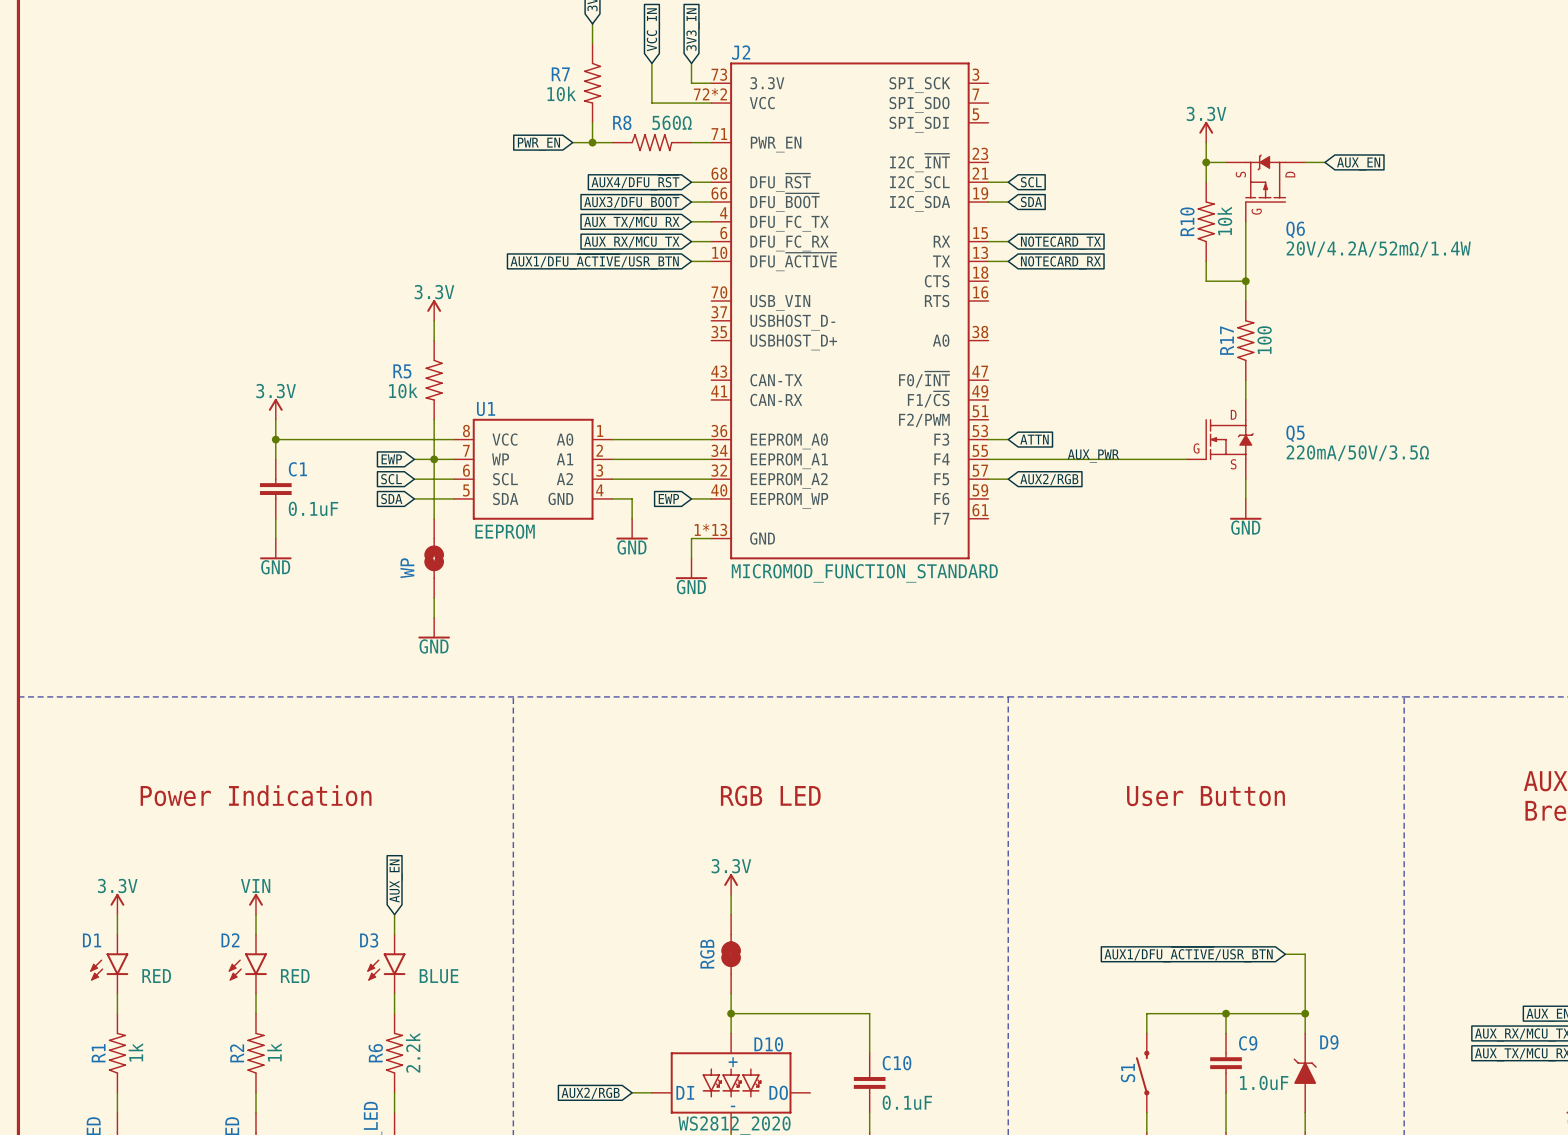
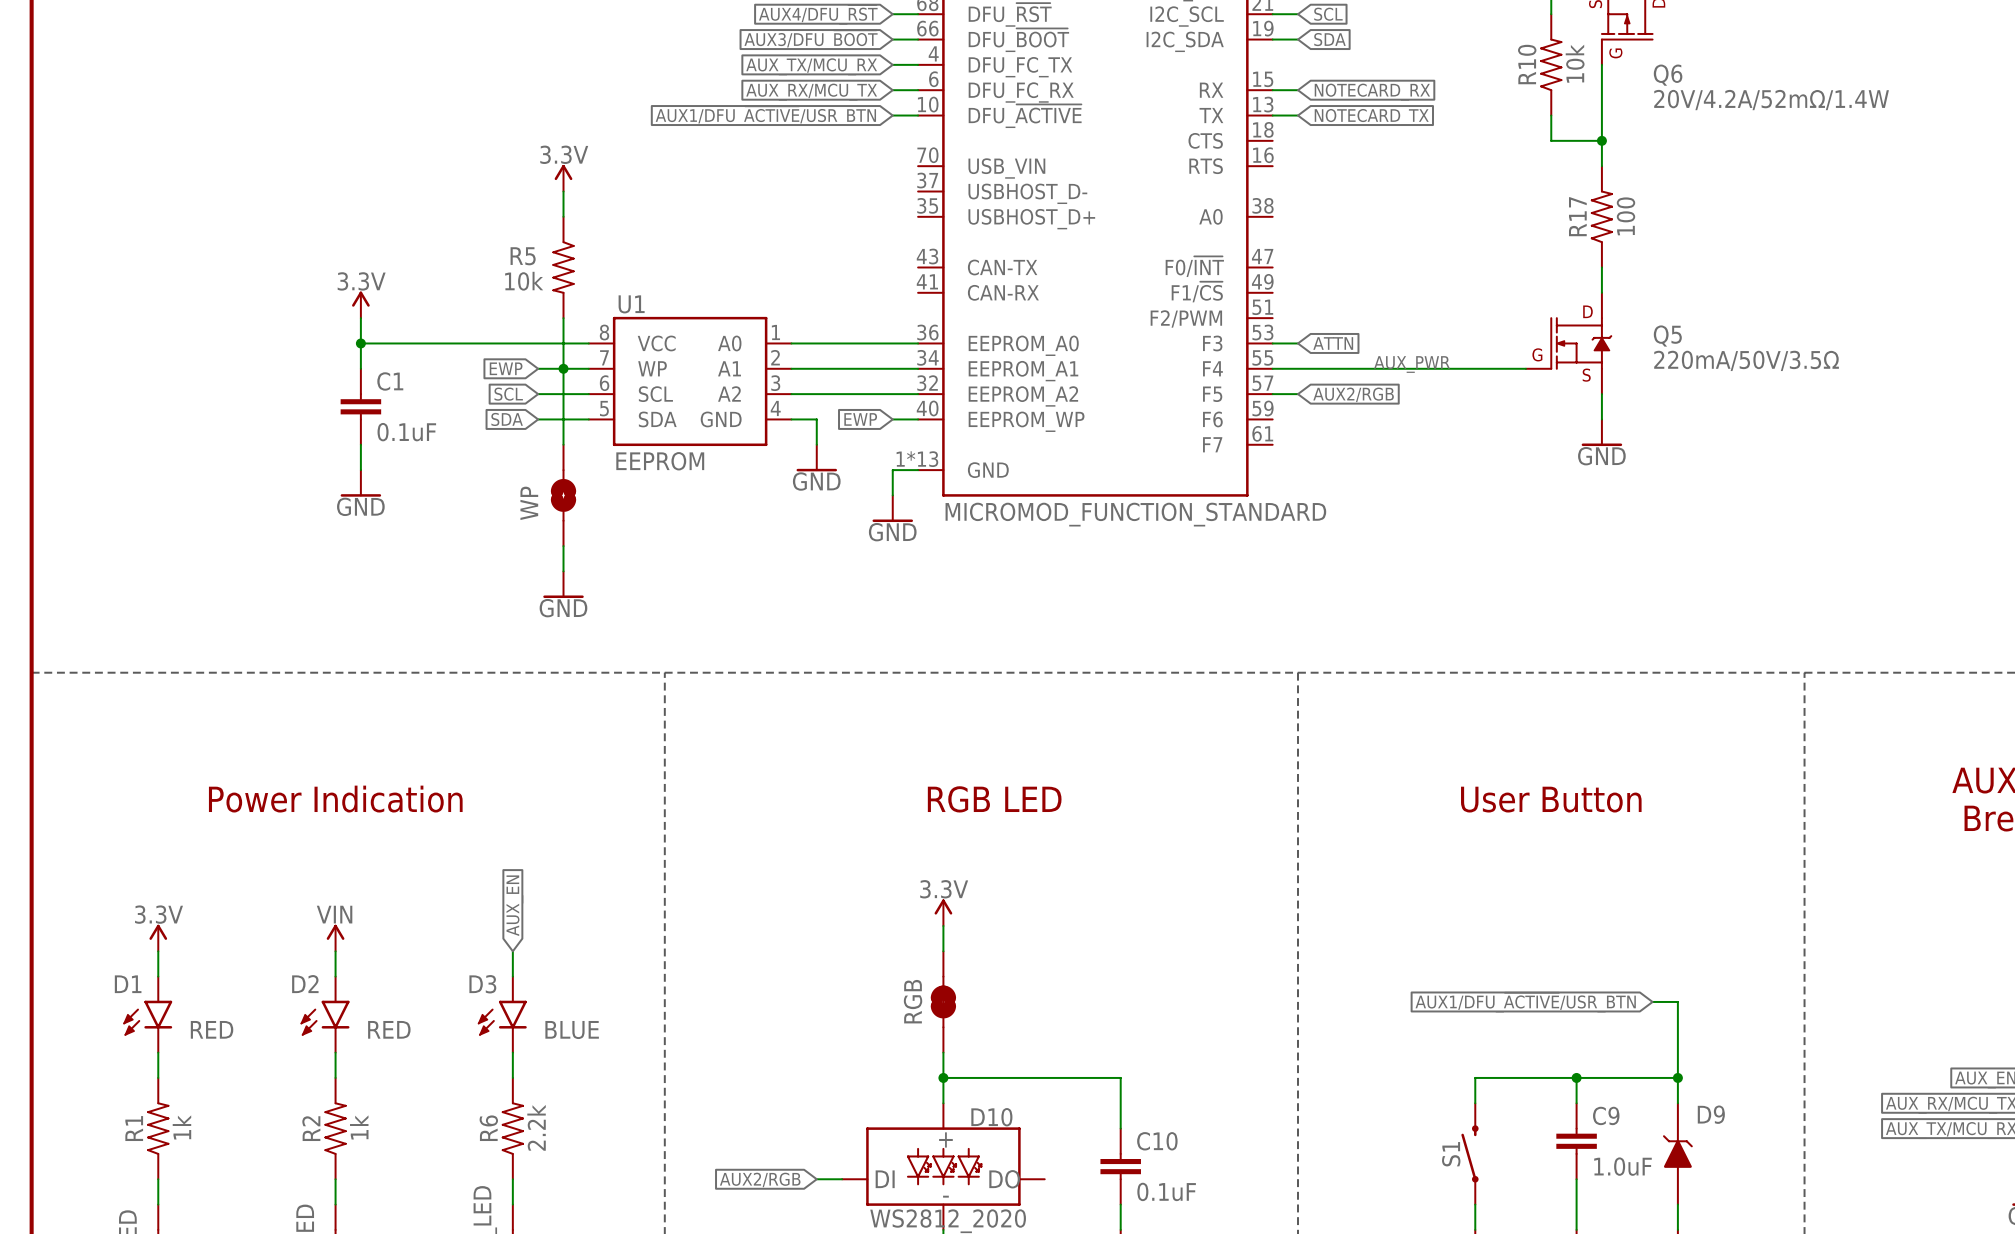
global label: NOTECARD_TX (1060, 243) -> NOTECARD_RX (1372, 92)
global label: NOTECARD_RX (1060, 262) -> NOTECARD_TX (1371, 117)

